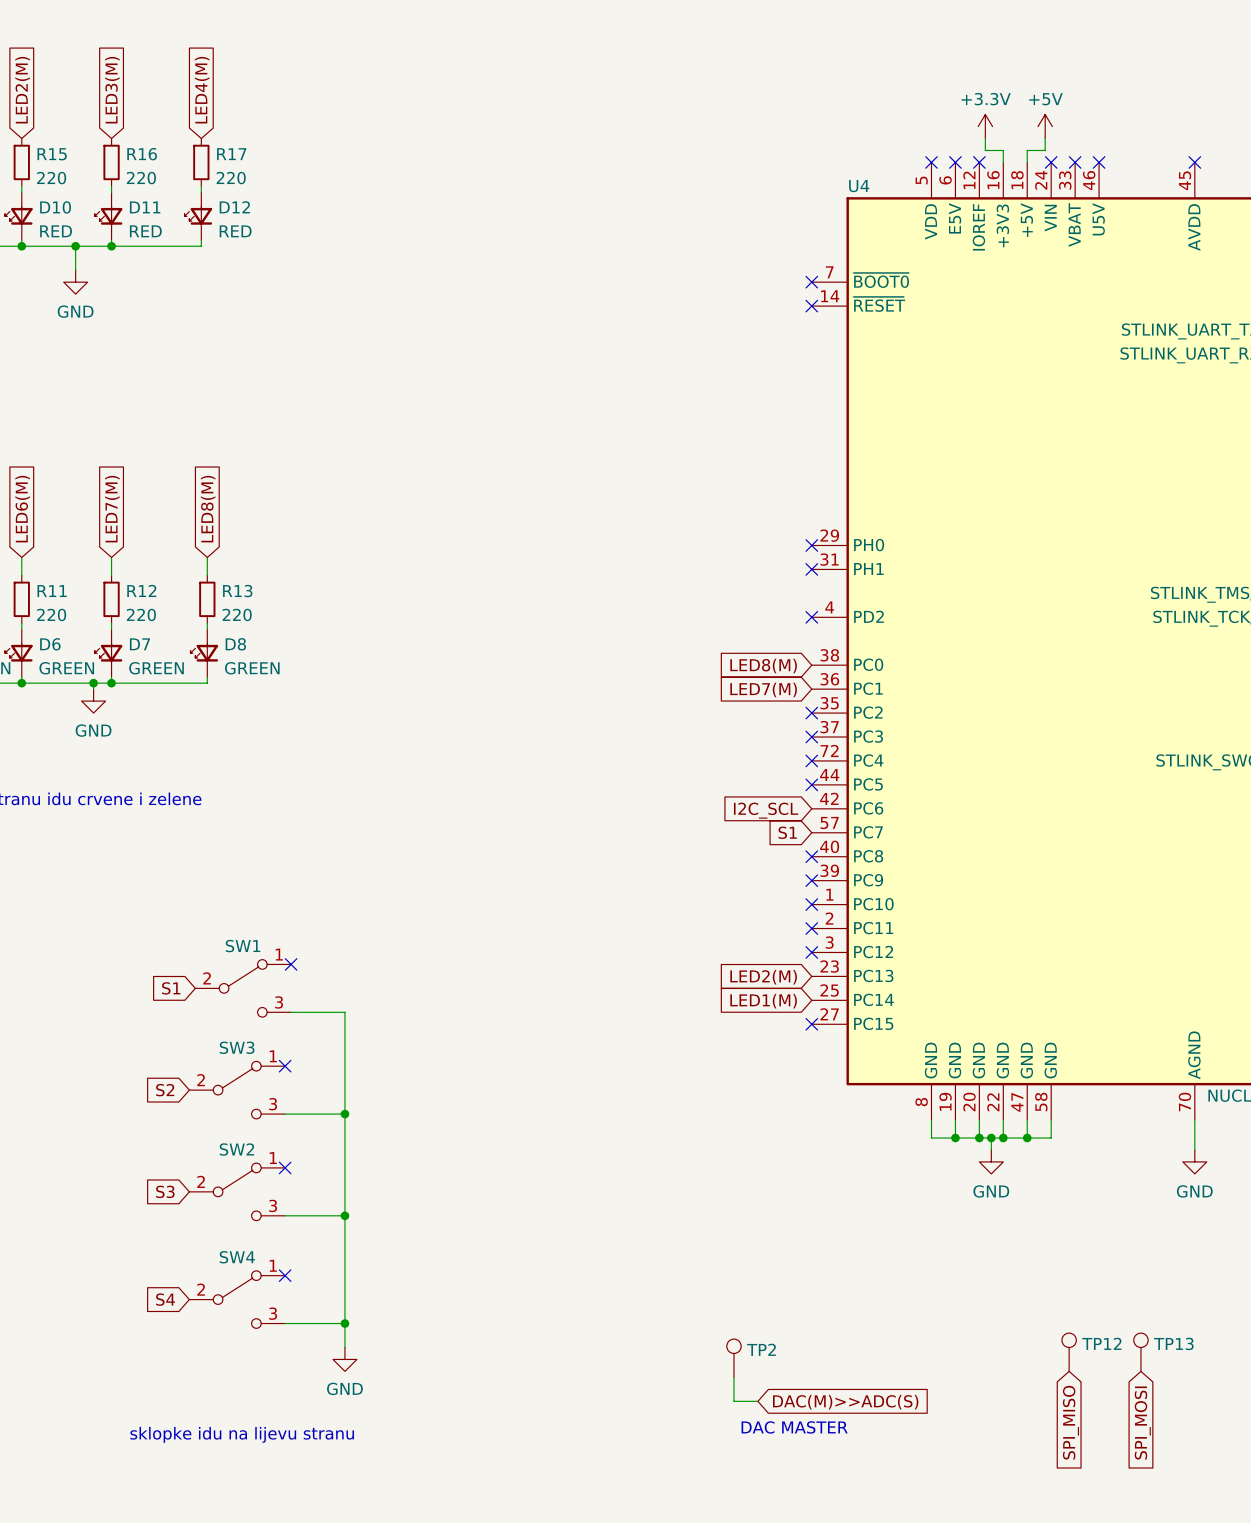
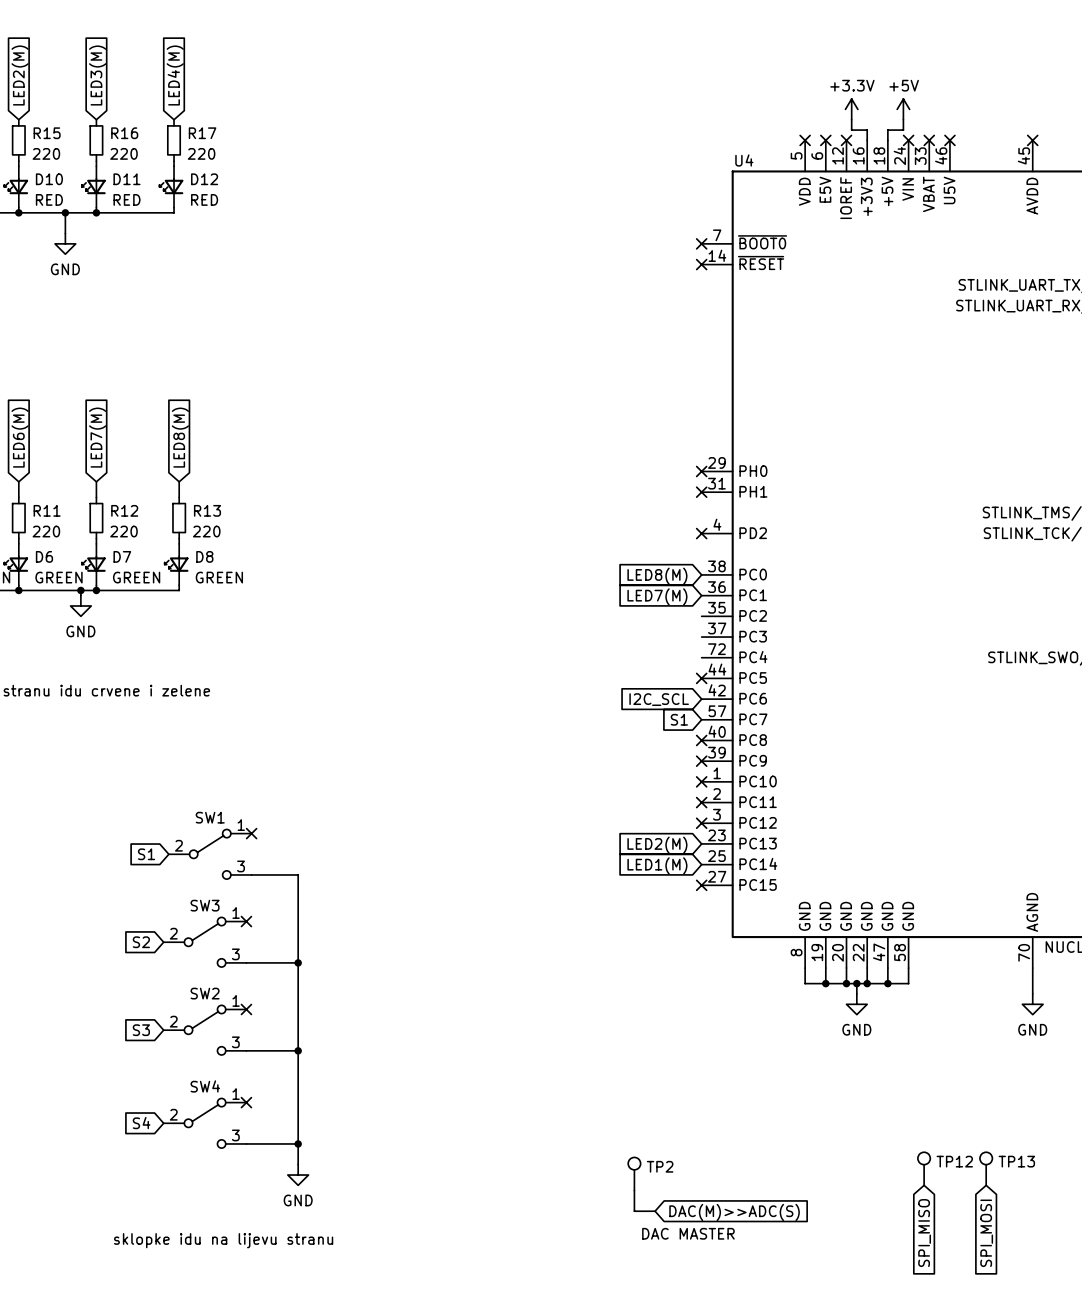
no-connect mark: (811, 713) -> none
no-connect mark: (811, 737) -> none
no-connect mark: (811, 760) -> none

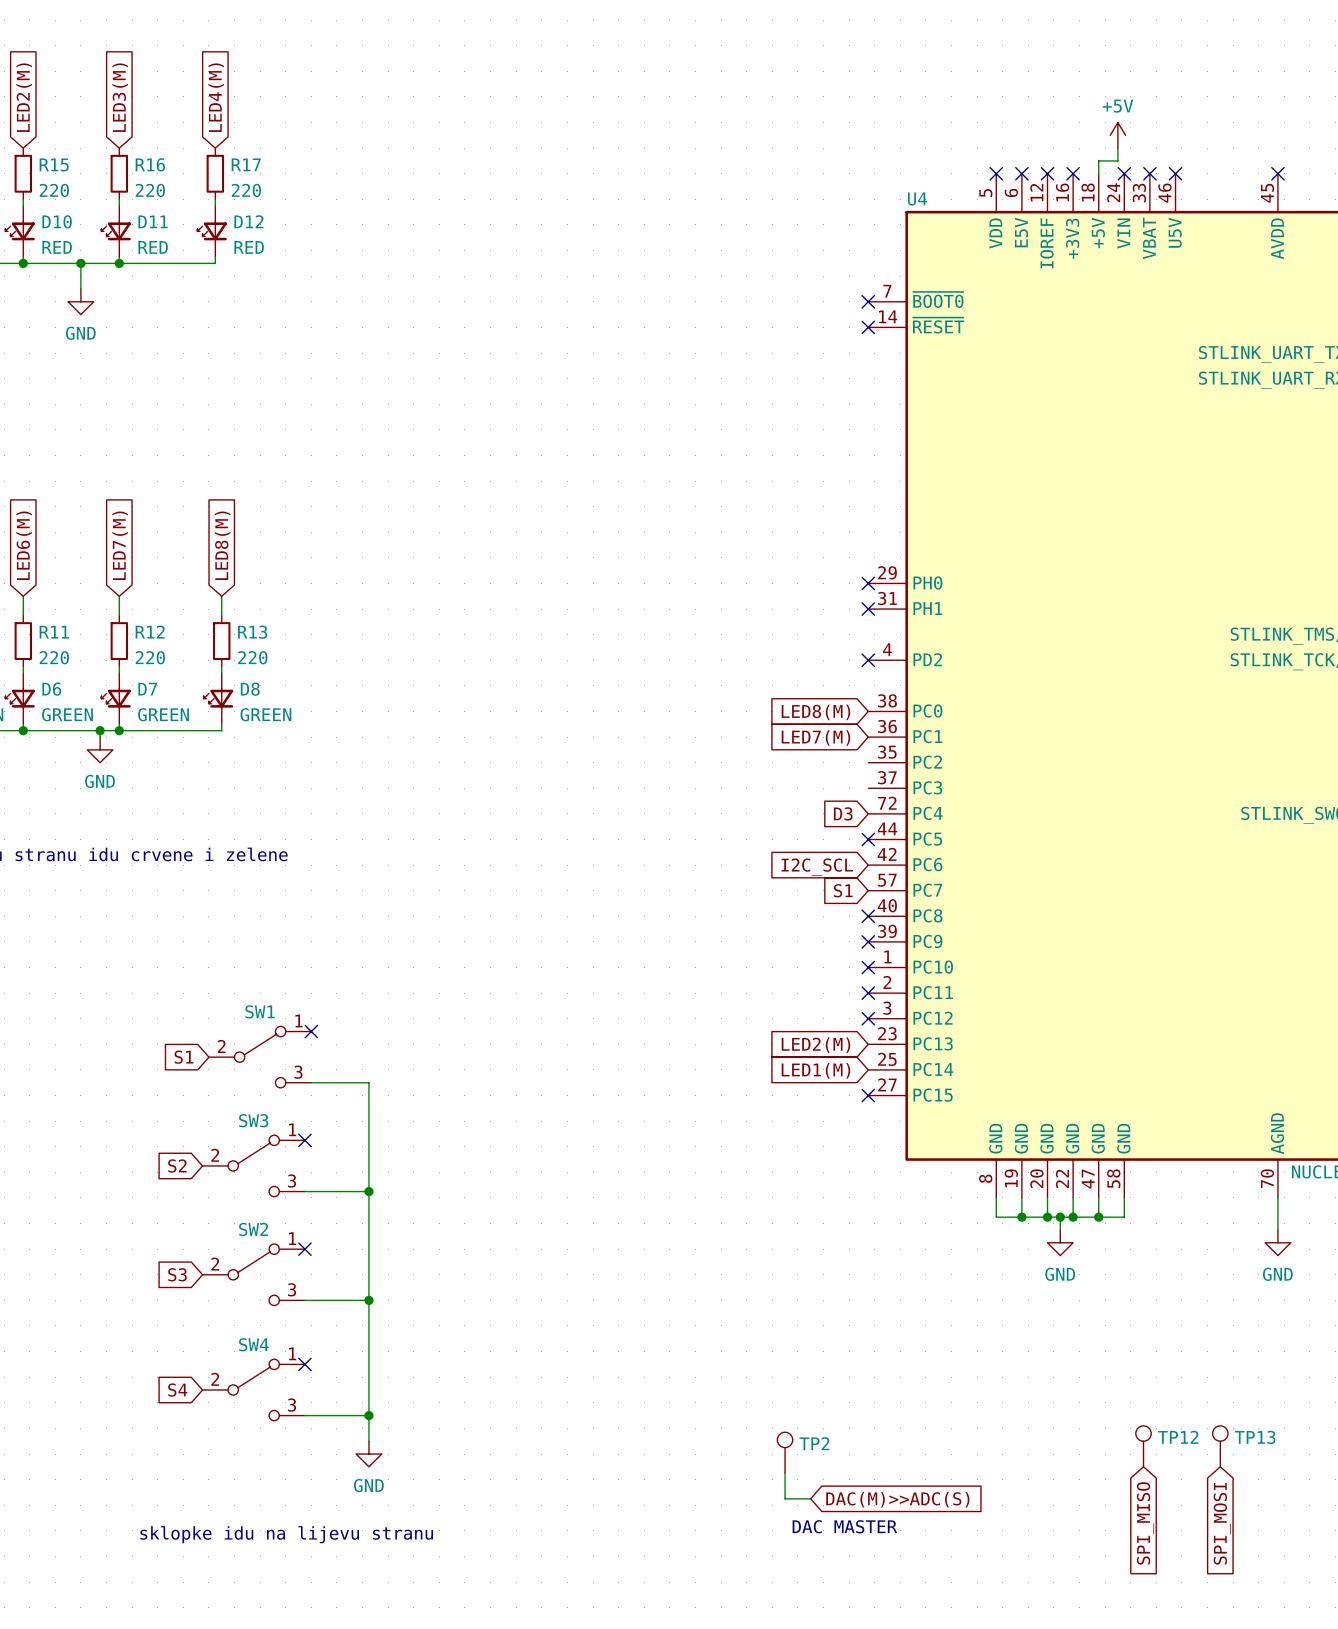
power symbol: +3.3V (851, 109) -> none
wire: (851, 119) (851, 130) (867, 130) (867, 140) -> none
no-connect mark: none -> (1073, 173)
global label: none -> D3 (843, 813)

